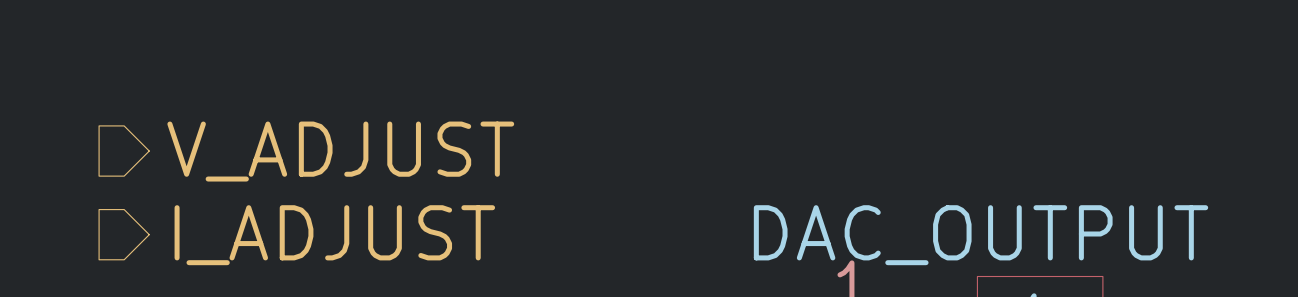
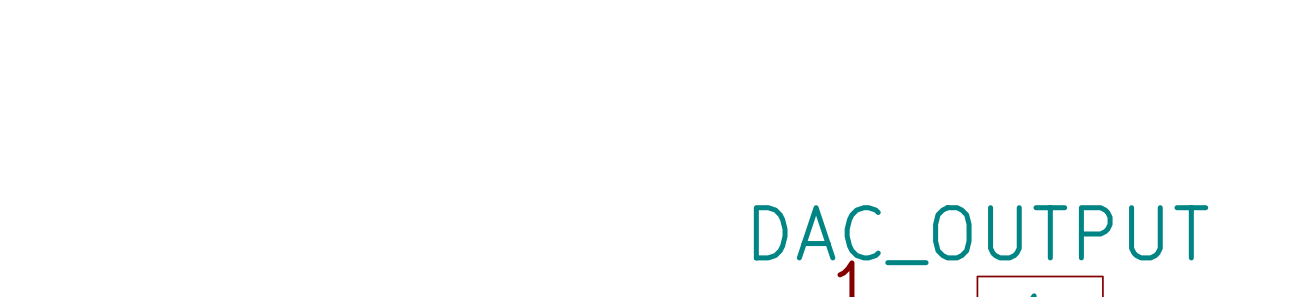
hierarchical label: V_ADJUST (340, 151) -> none
hierarchical label: I_ADJUST (334, 235) -> none

